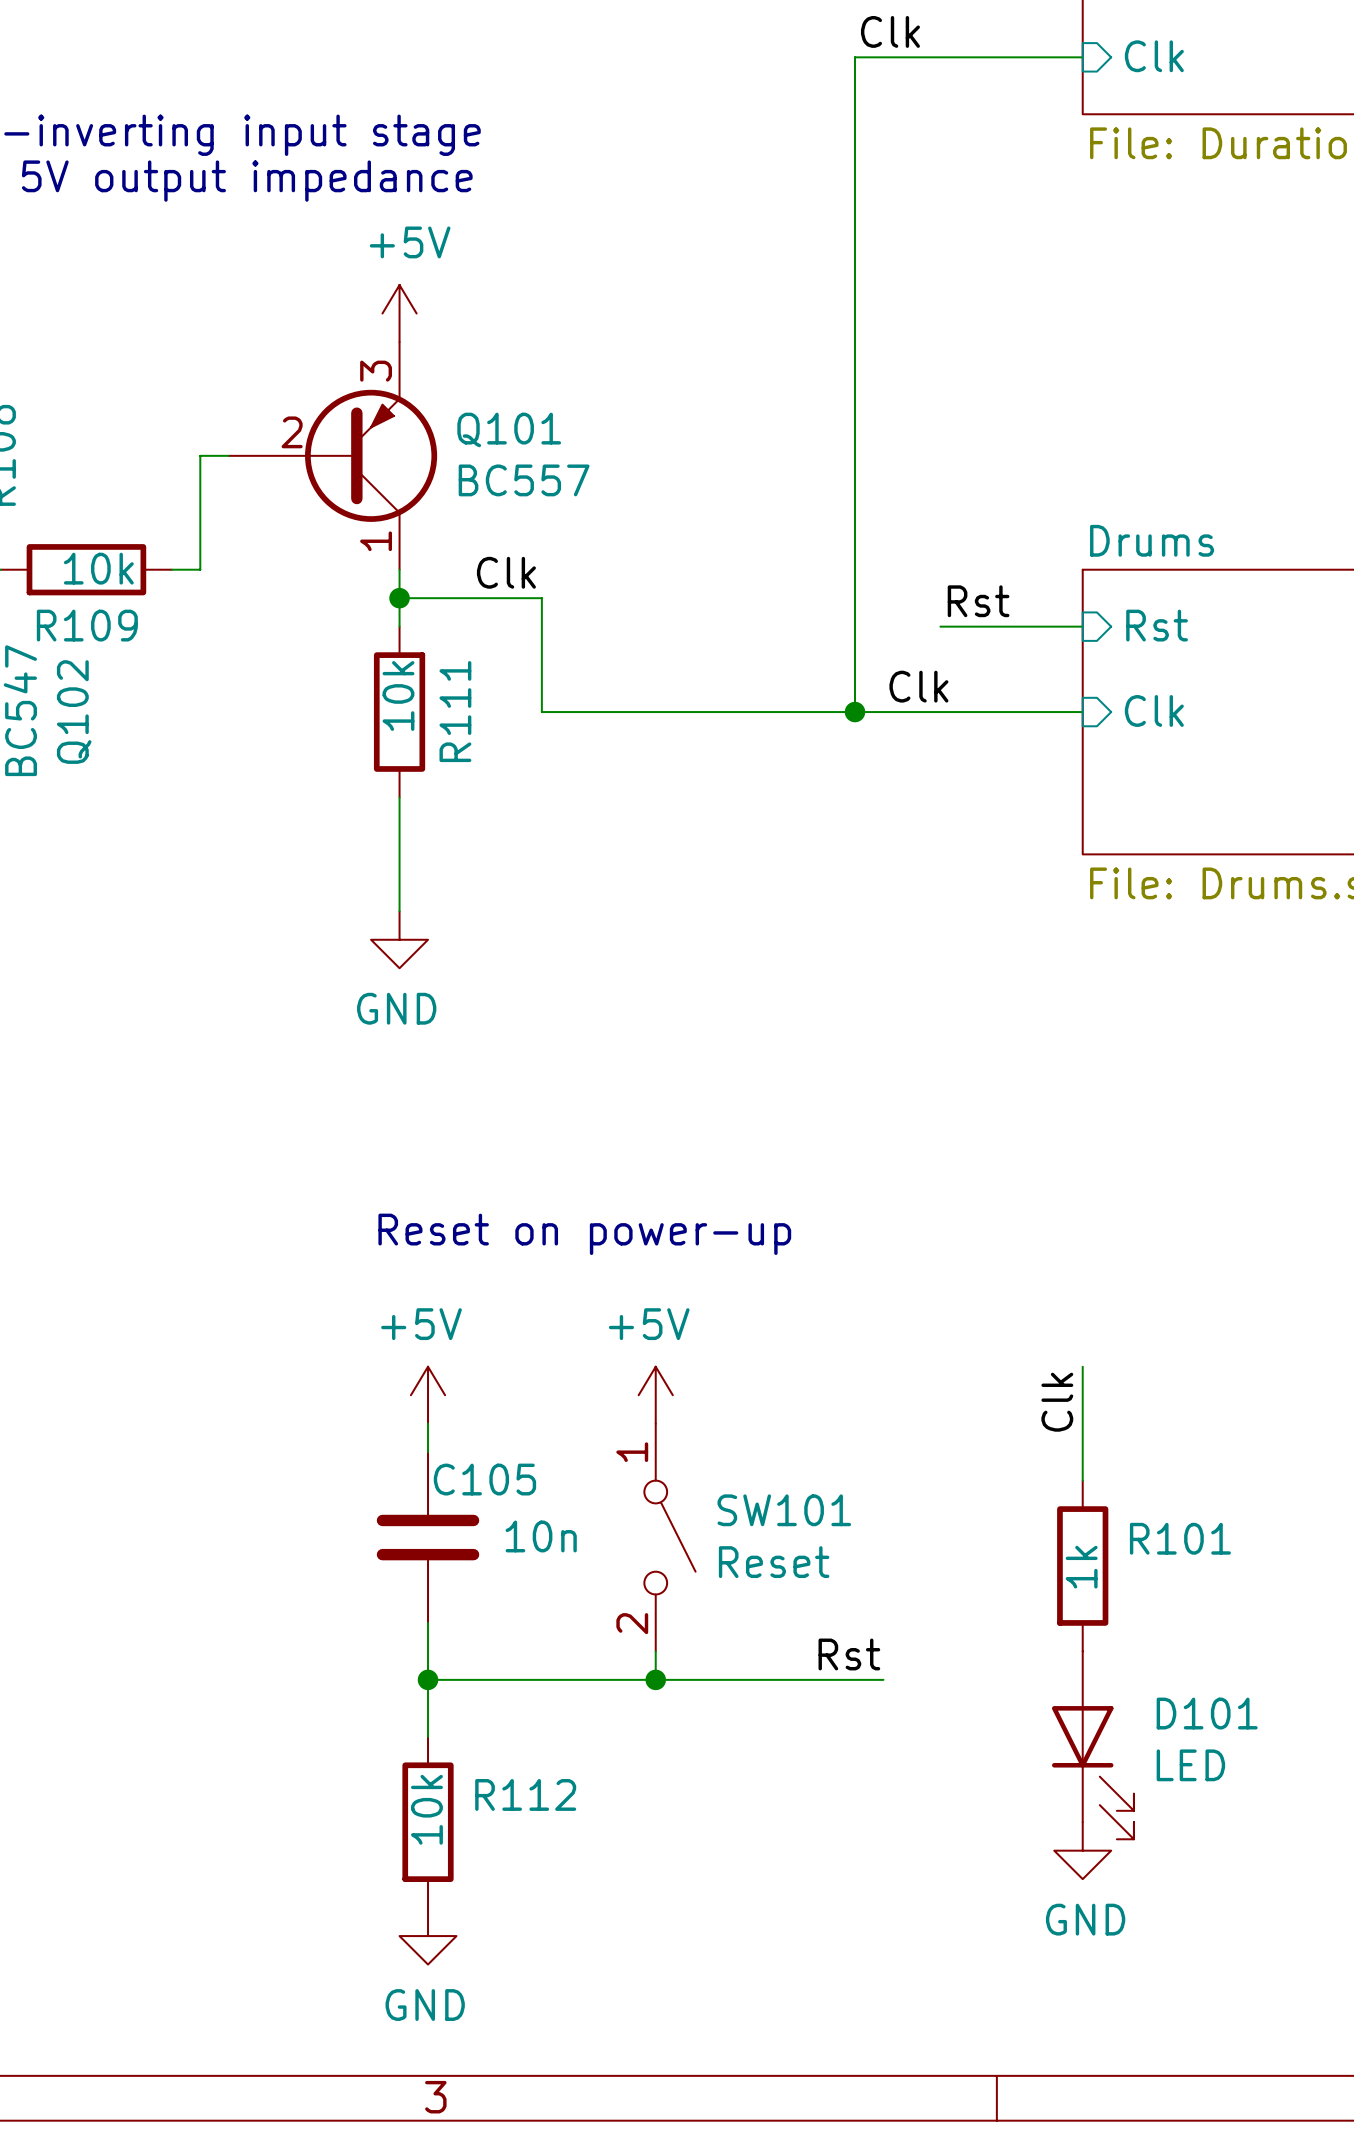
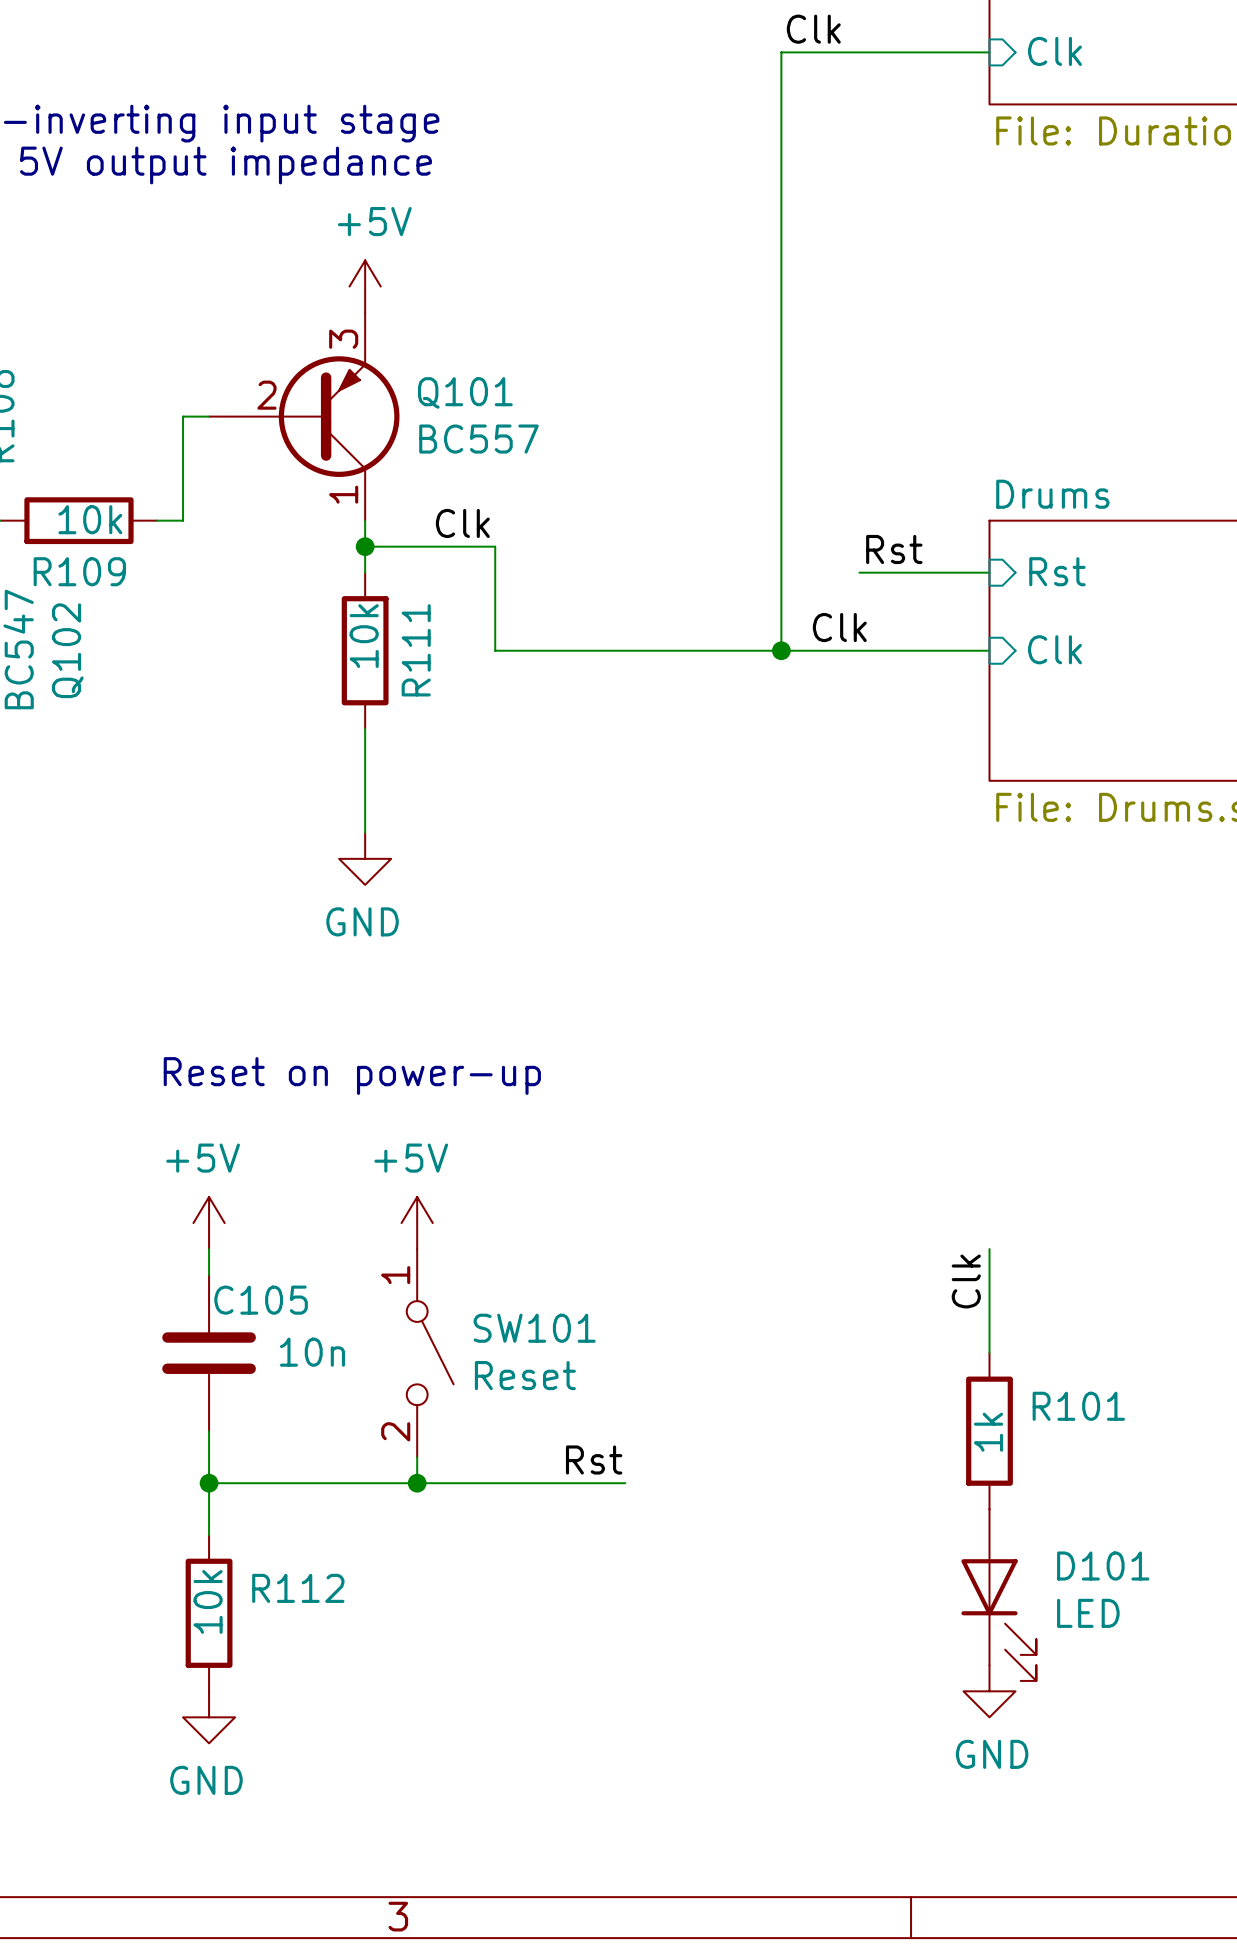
text position: Reset on power-up (584, 1234) -> Reset on power-up (352, 1076)
power symbol: none -> +5V (209, 1223)
power symbol position: +5V (428, 1395) -> +5V (417, 1223)
power symbol: +5V (655, 1395) -> none
wire: (428, 1423) (428, 1452) -> (209, 1249) (209, 1275)
C105 position: (428, 1537) -> (209, 1353)
SW101 position: (669, 1537) -> (430, 1353)
junction: none -> (209, 1483)
wire: (428, 1622) (428, 1736) -> (209, 1431) (209, 1535)
wire: (655, 1651) (655, 1679) -> (417, 1457) (417, 1483)
label position: Rst (849, 1654) -> Rst (594, 1459)
wire: (428, 1679) (883, 1679) -> (209, 1483) (625, 1483)
junction position: (428, 1679) -> (417, 1483)
junction: (655, 1679) -> none
R112 position: (428, 1822) -> (209, 1613)
power symbol position: GND (428, 1936) -> GND (209, 1717)

